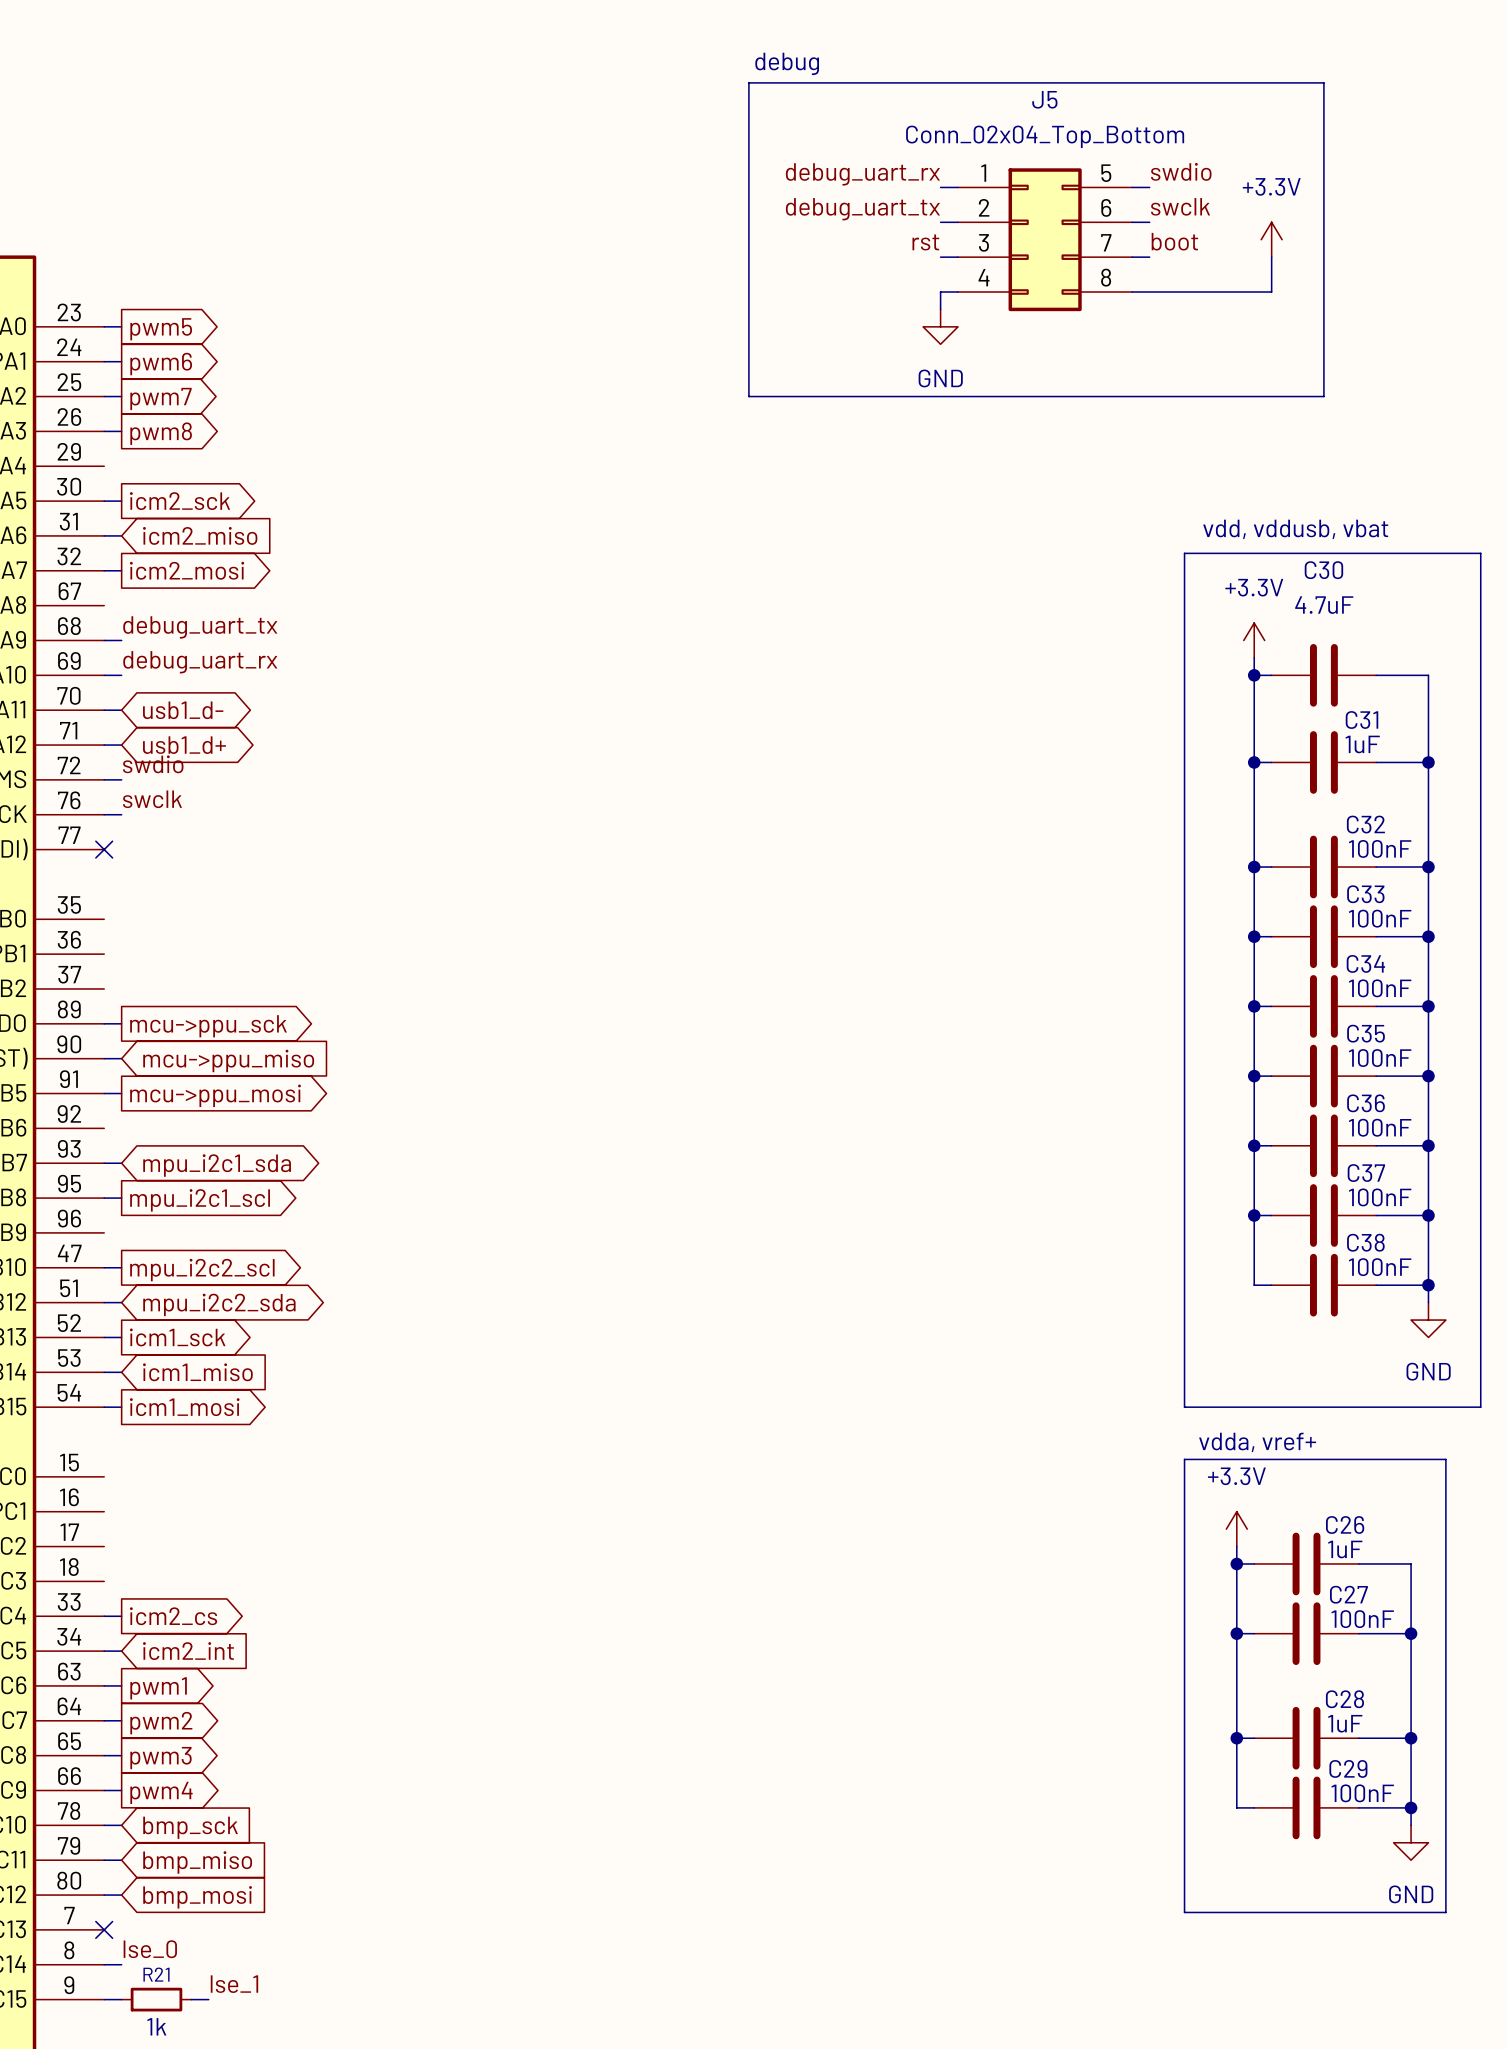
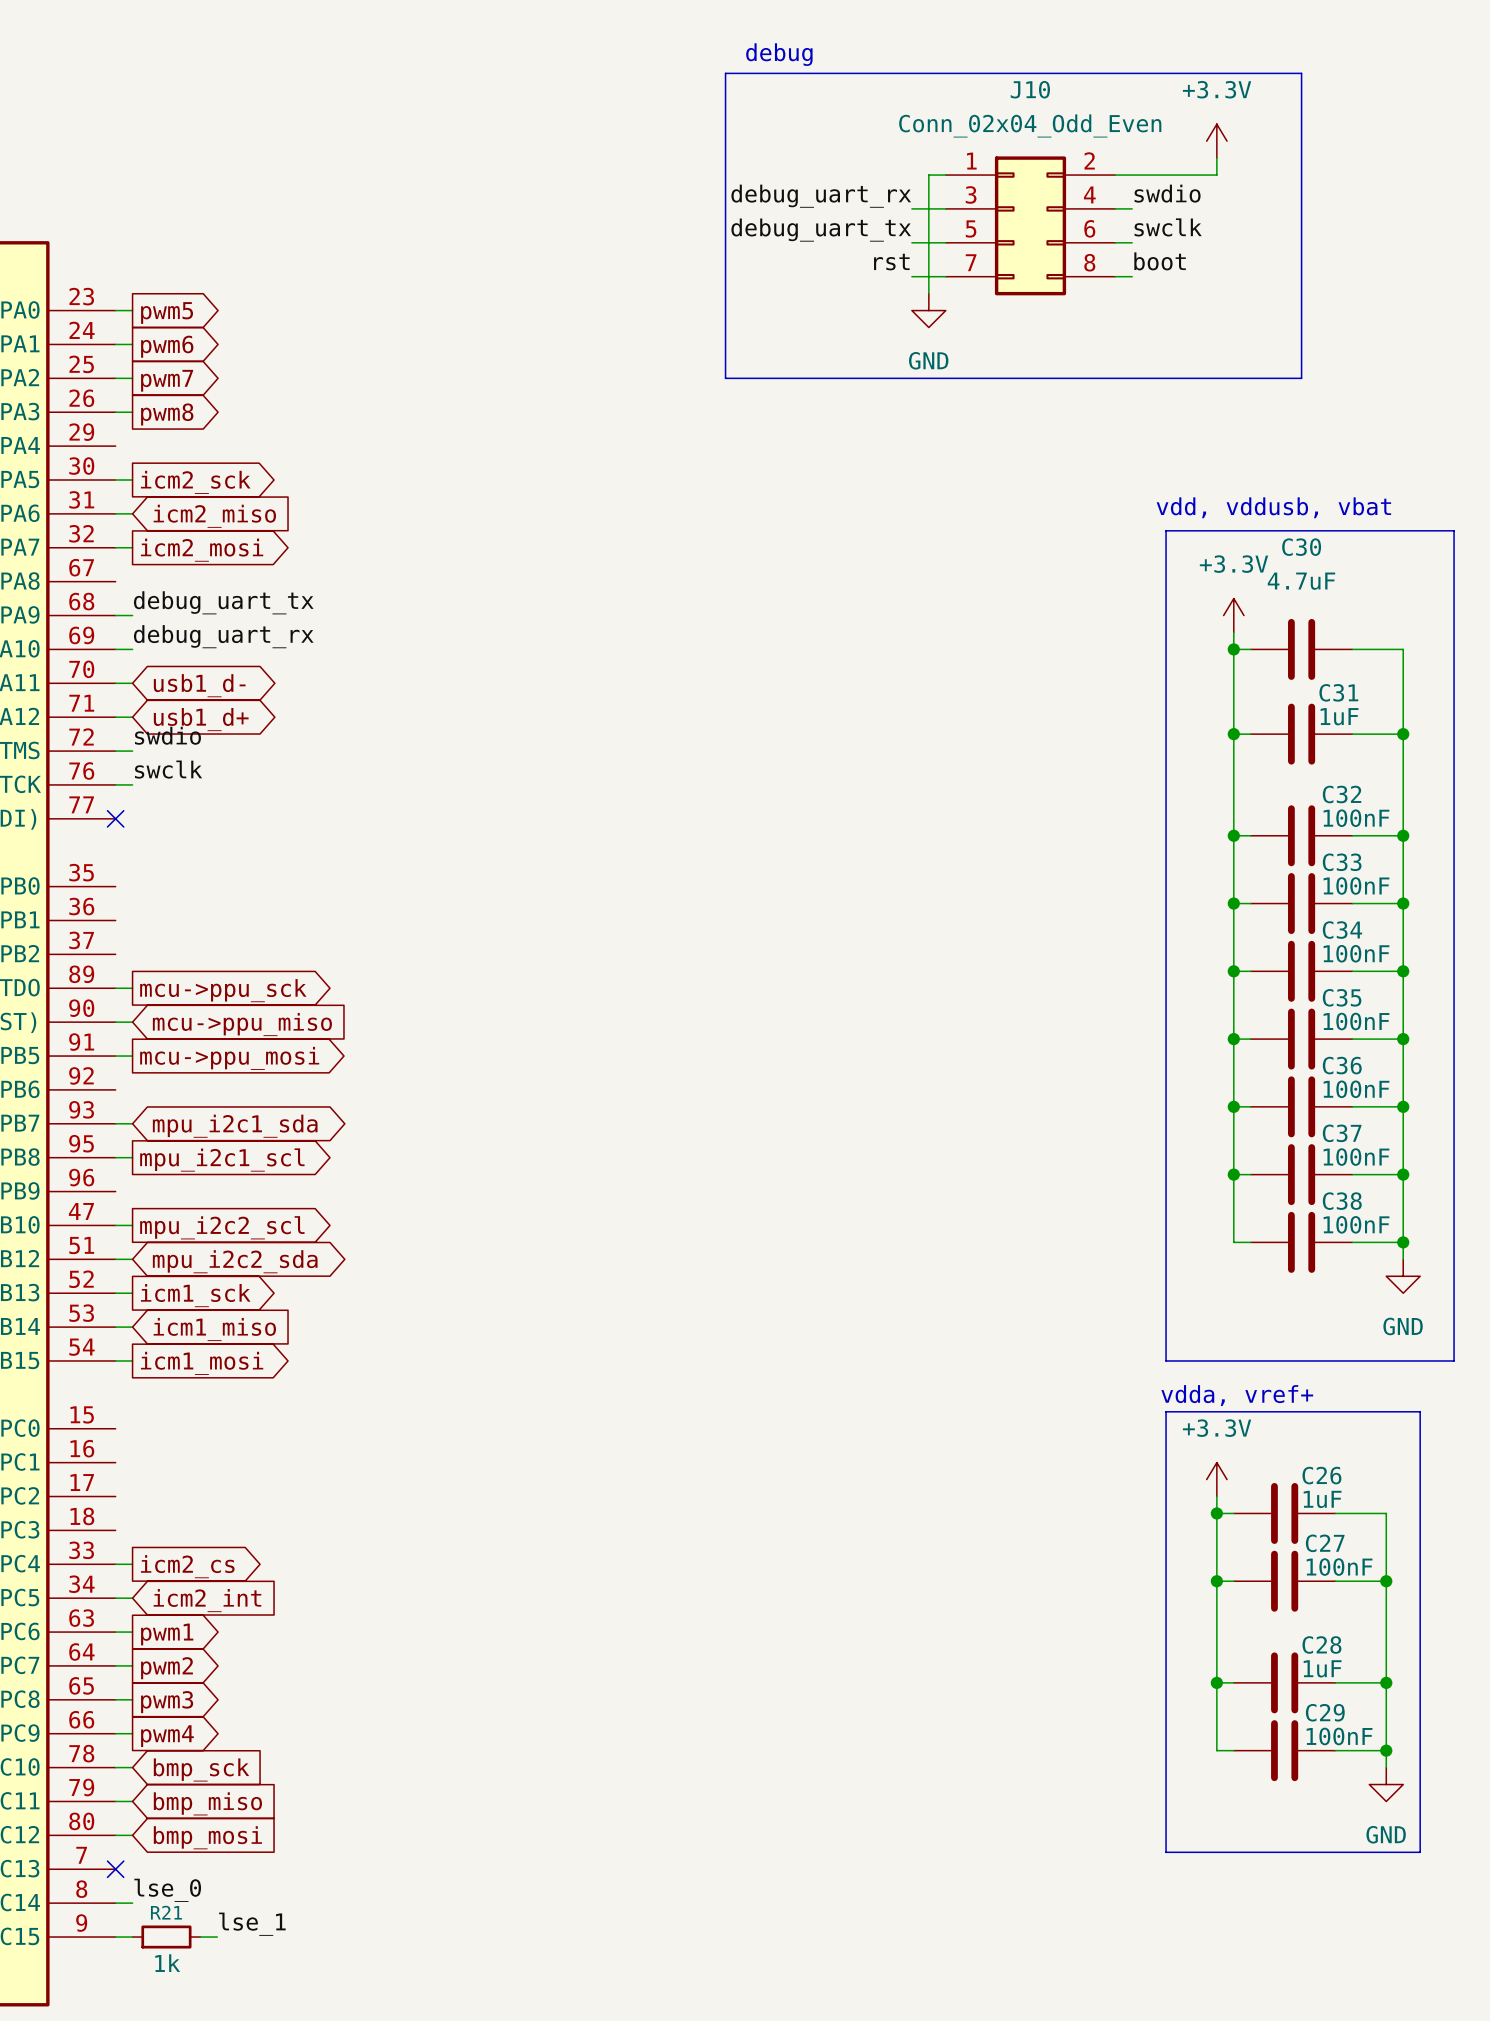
line: (748, 82) (748, 396) -> (742, 73) (725, 73) (725, 378) (742, 378)
J5 name: J5 (1044, 99) -> J10 (1030, 89)
J5 value: Conn_02x04_Top_Bottom (1045, 136) -> Conn_02x04_Odd_Even (1030, 125)
wire: none -> (1216, 158) (1216, 175) (1132, 175)
label: swdio (1181, 171) -> none
J5 pin number: 5 (1106, 173) -> 2 (1089, 160)
label position: debug_uart_rx (862, 174) -> debug_uart_rx (821, 196)
wire: none -> (928, 175) (928, 276) (911, 276)
label: swclk (1180, 206) -> swdio (1167, 193)
J5 pin number: 2 (984, 207) -> 3 (971, 194)
J5 pin number: 6 (1106, 207) -> 4 (1089, 194)
label position: debug_uart_tx (862, 209) -> debug_uart_tx (821, 230)
wire: none -> (911, 208) (928, 208)
power symbol position: +3.3V (1271, 239) -> +3.3V (1216, 141)
label: boot (1174, 241) -> swclk (1168, 227)
label position: rst (925, 242) -> rst (891, 262)
J5 pin number: 3 (983, 242) -> 5 (971, 229)
J5 pin number: 7 (1106, 242) -> 6 (1089, 228)
wire: none -> (911, 242) (928, 242)
wire: (1271, 257) (1271, 292) (1149, 292) -> none
label: none -> boot (1160, 261)
J5 pin number: 4 (984, 277) -> 7 (971, 262)

